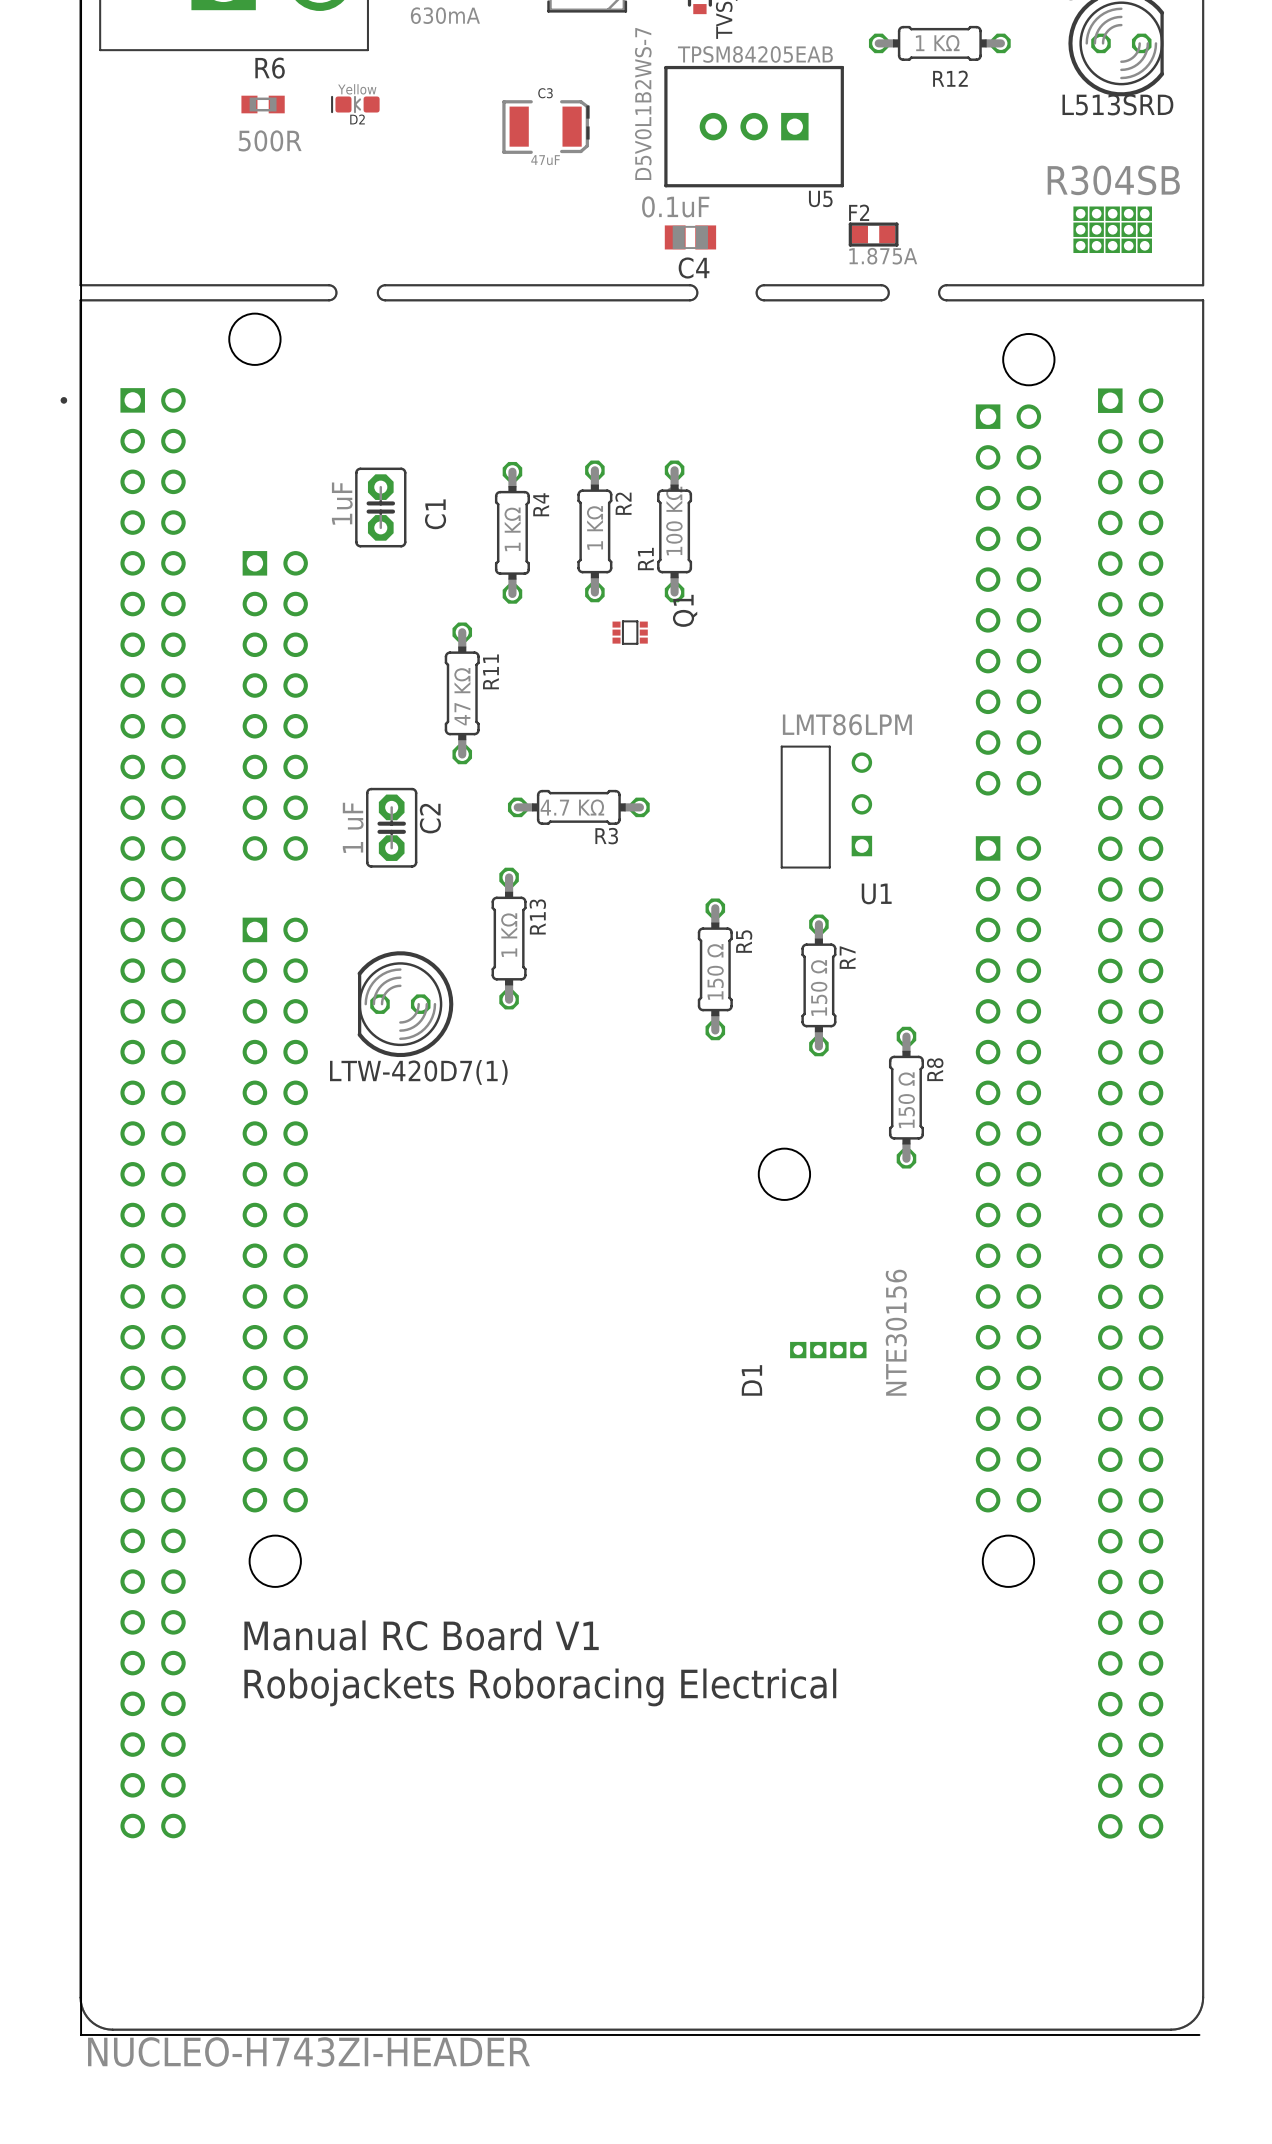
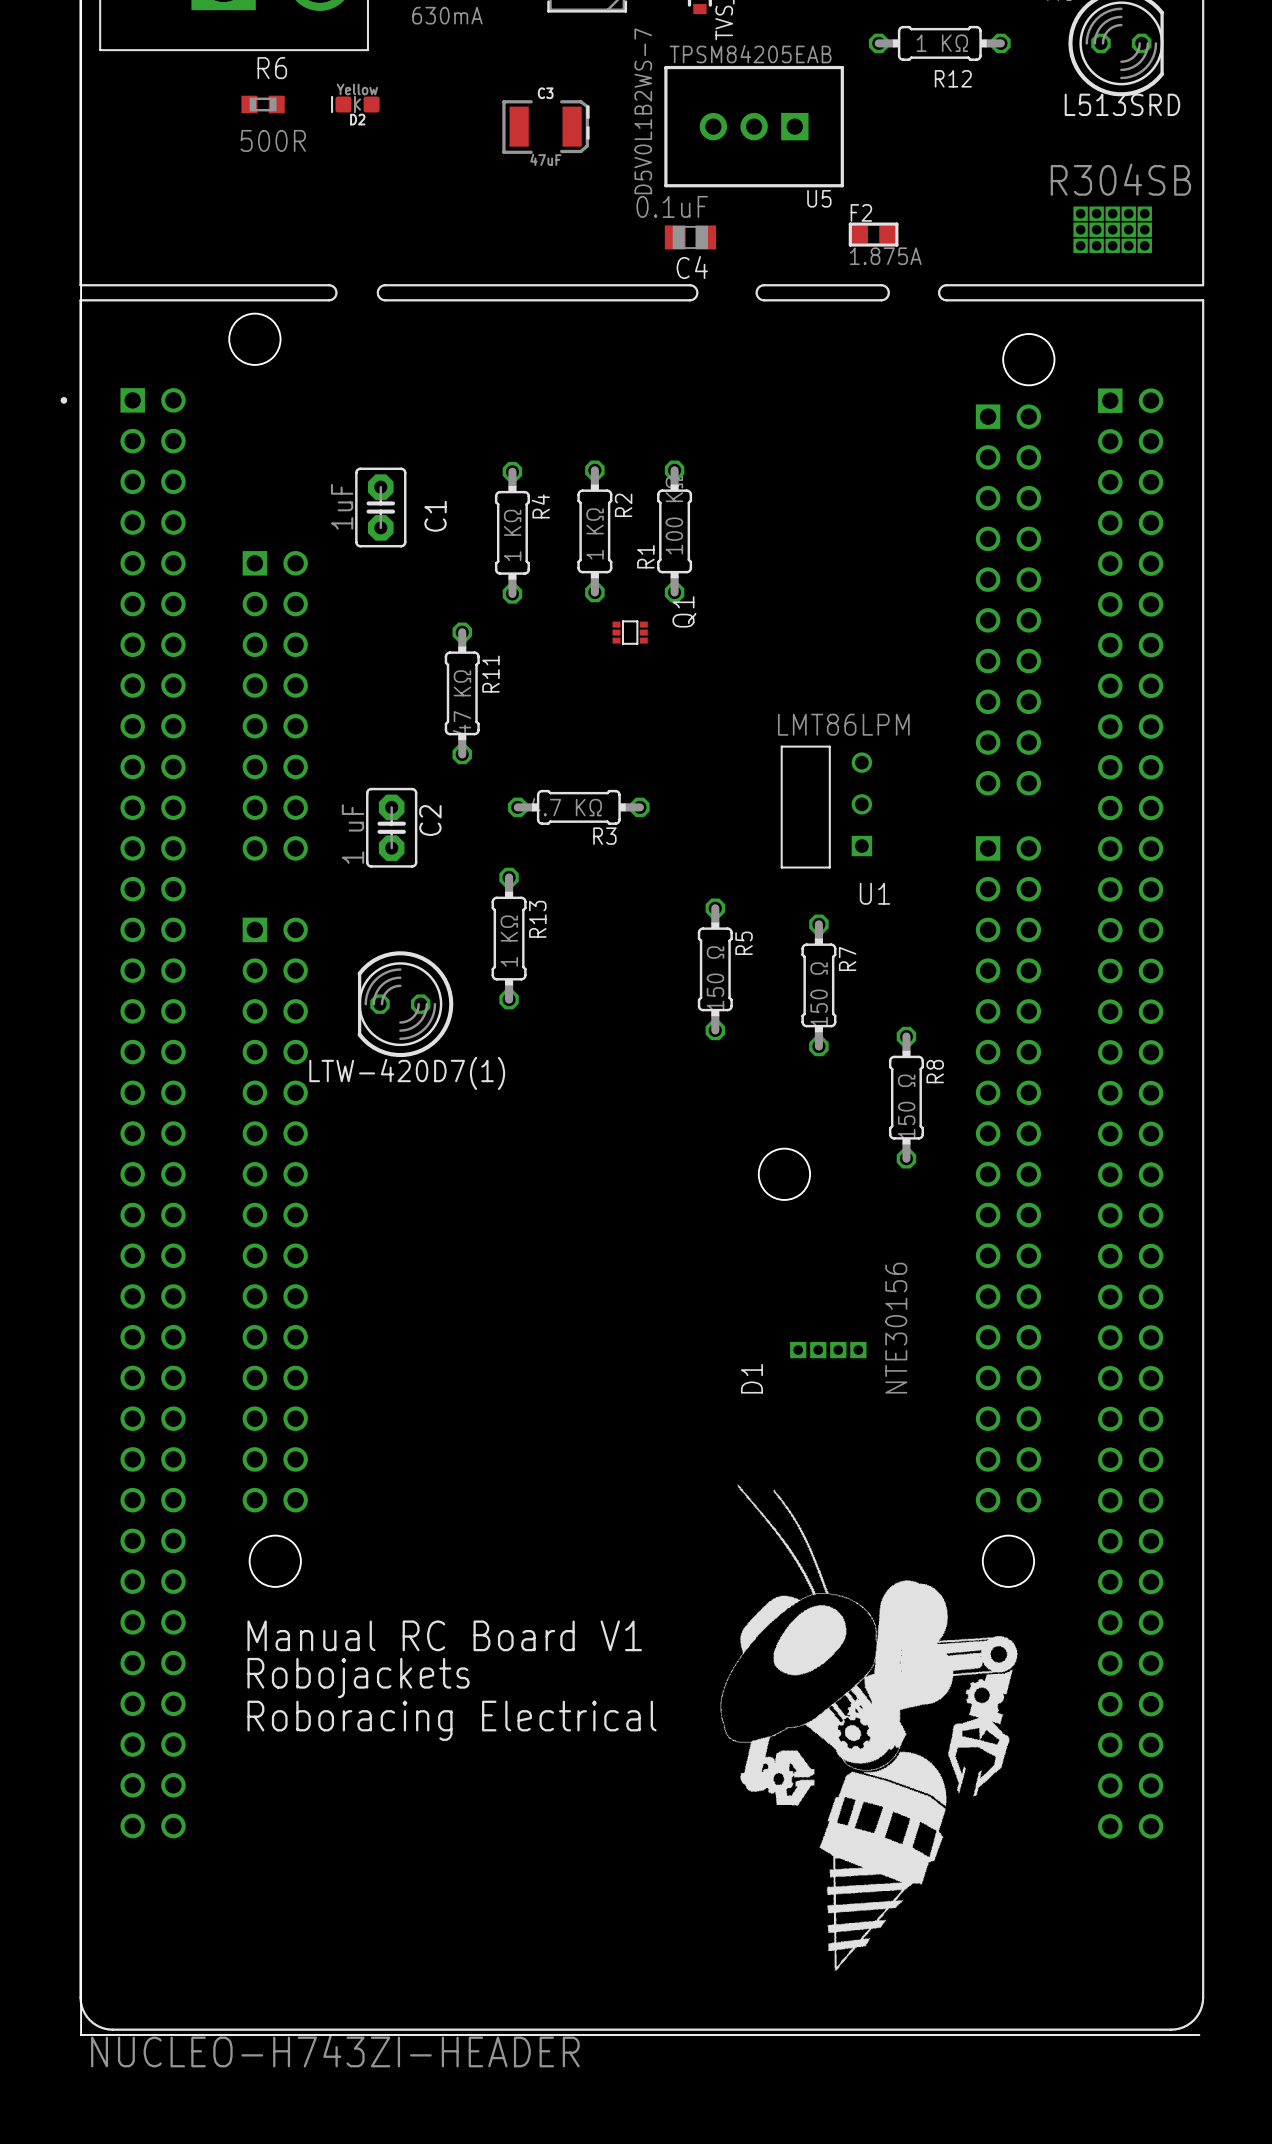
drawing: none -> [720, 1484, 1018, 1971]
text: Robojackets Roboracing Electrical (540, 1687) -> Robojackets (358, 1678)
text: none -> Roboracing Electrical (452, 1720)

